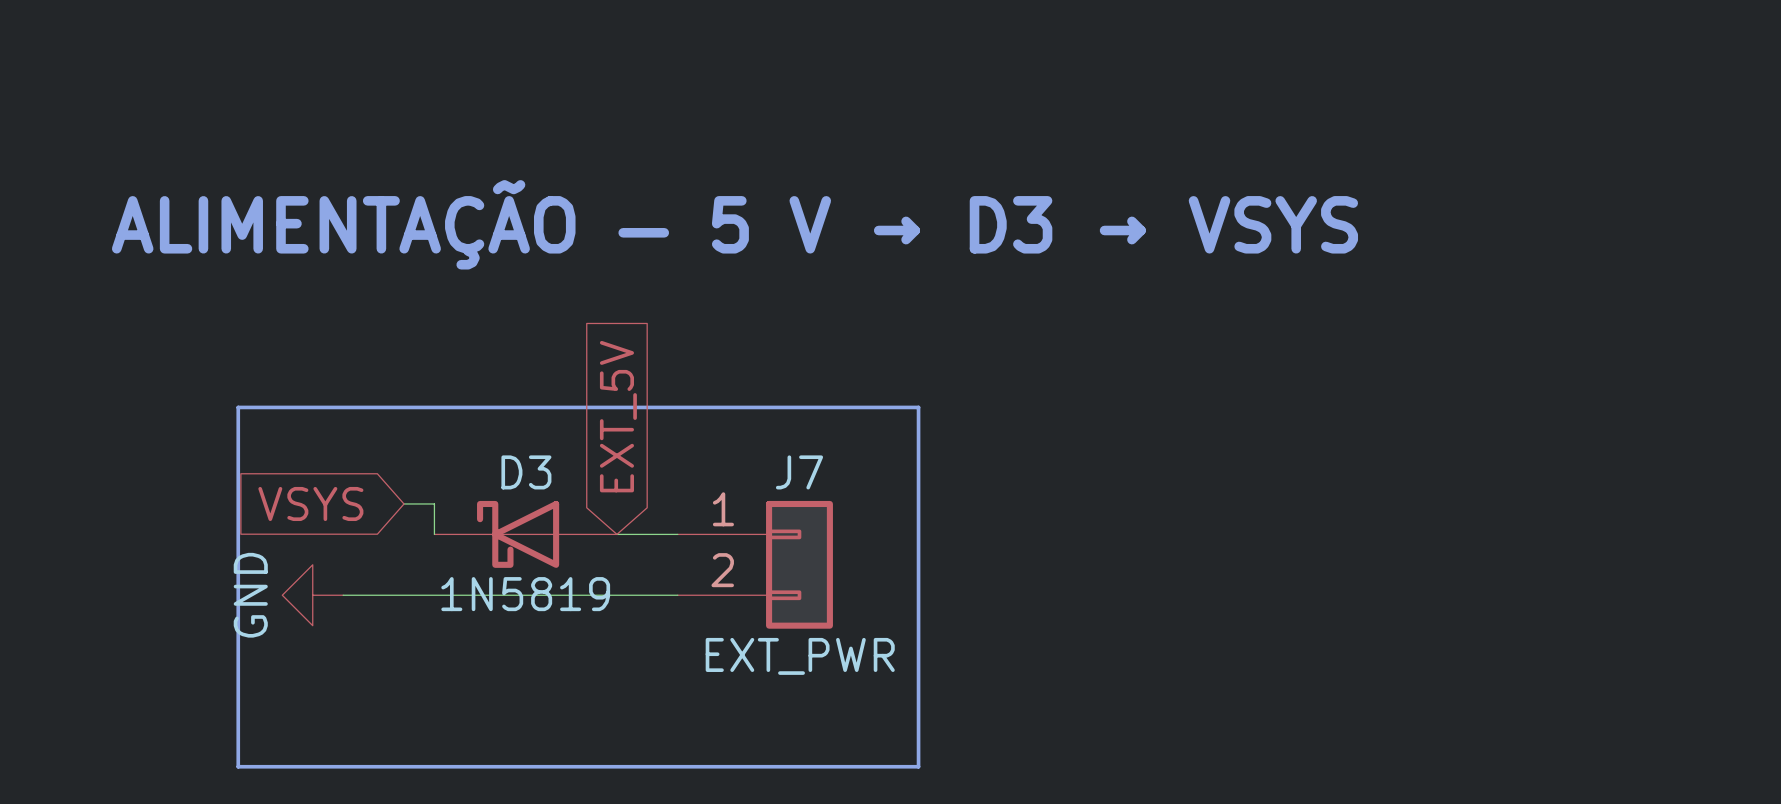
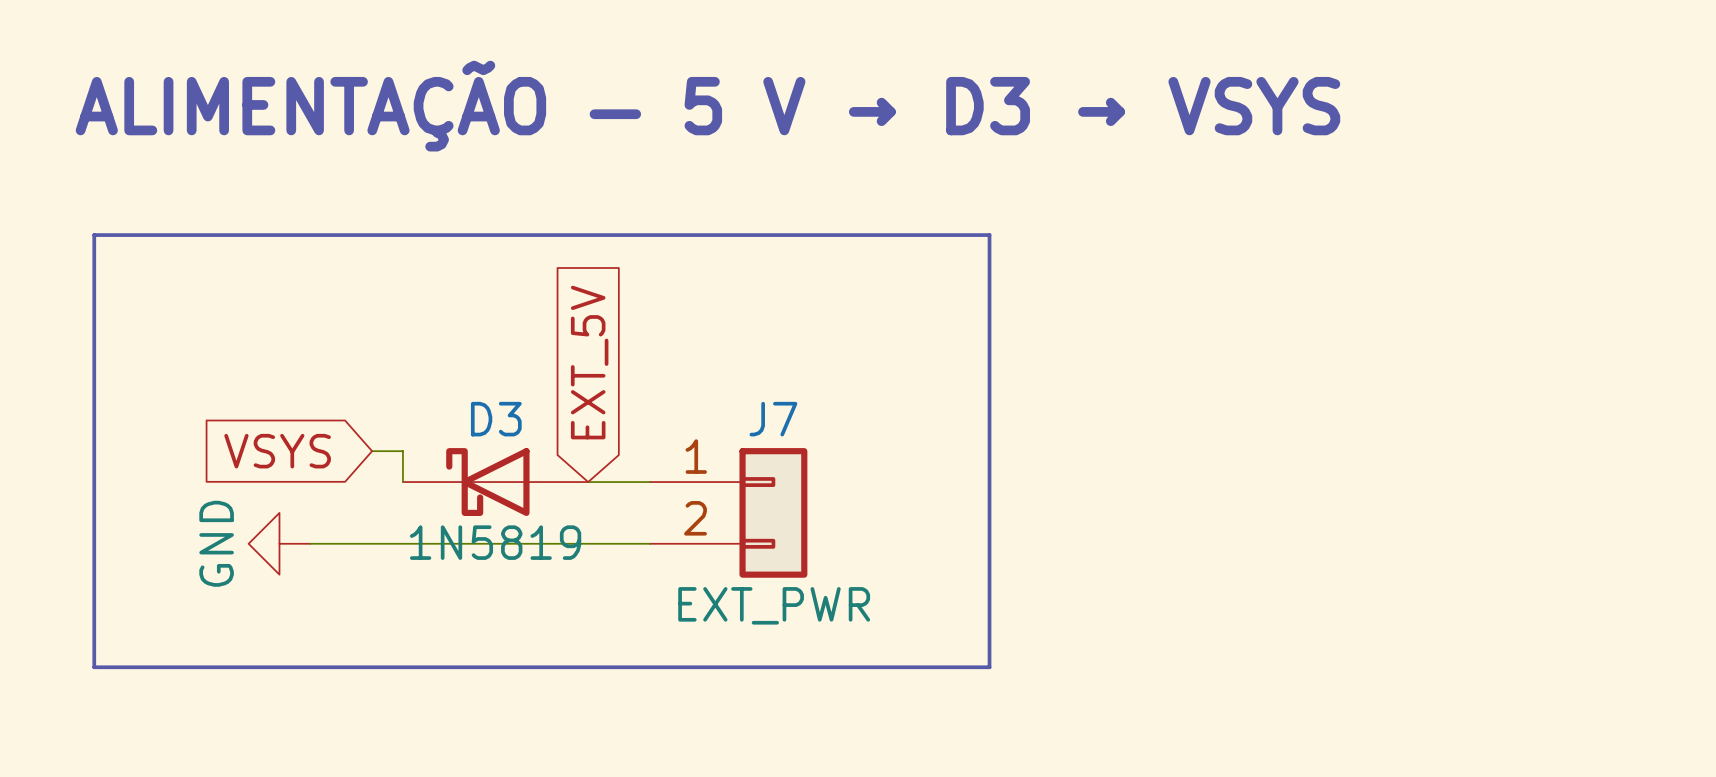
text position: ALIMENTAÇÃO — 5 V → D3 → VSYS (734, 224) -> ALIMENTAÇÃO — 5 V → D3 → VSYS (707, 106)
line: (238, 407) (918, 407) (918, 766) (238, 766) (238, 407) -> (94, 235) (94, 667) (989, 667) (989, 235) (94, 235)

